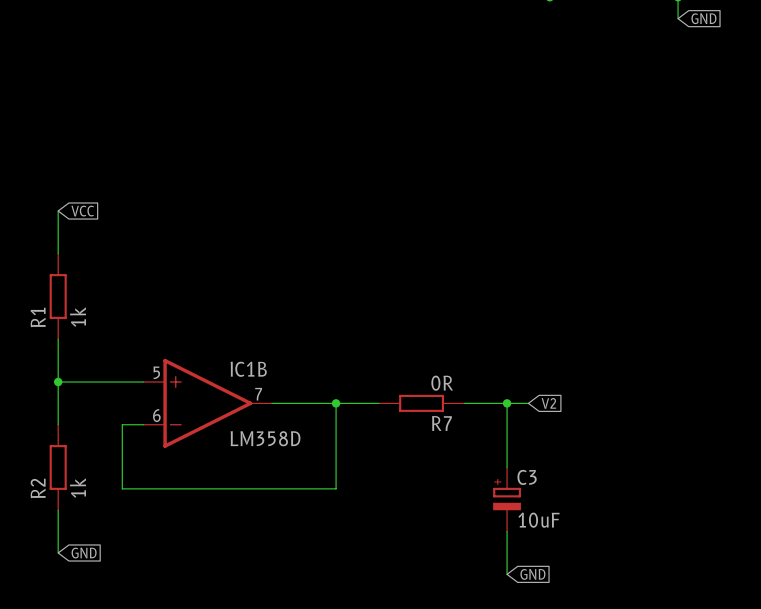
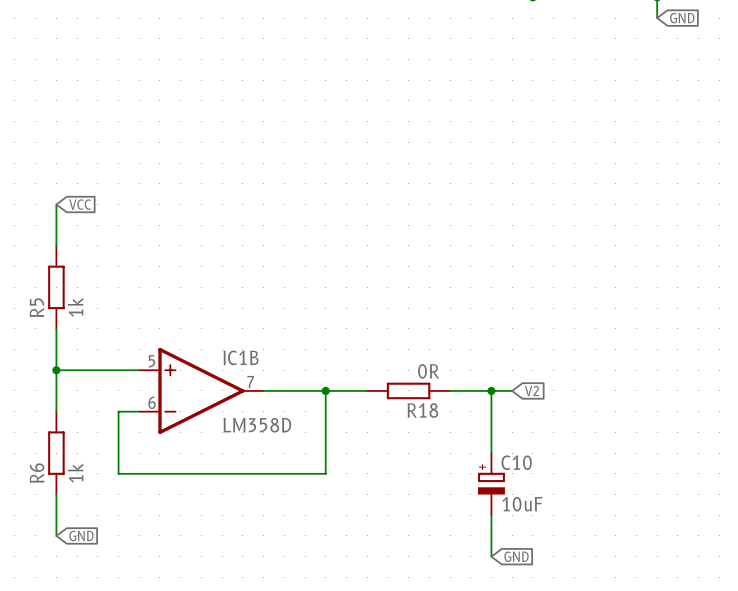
R1 name: R1 (38, 317) -> R5 (36, 307)
R7 name: R7 (441, 423) -> R18 (422, 410)
C3 name: C3 (527, 477) -> C10 (516, 462)
R2 name: R2 (38, 488) -> R6 (37, 473)

